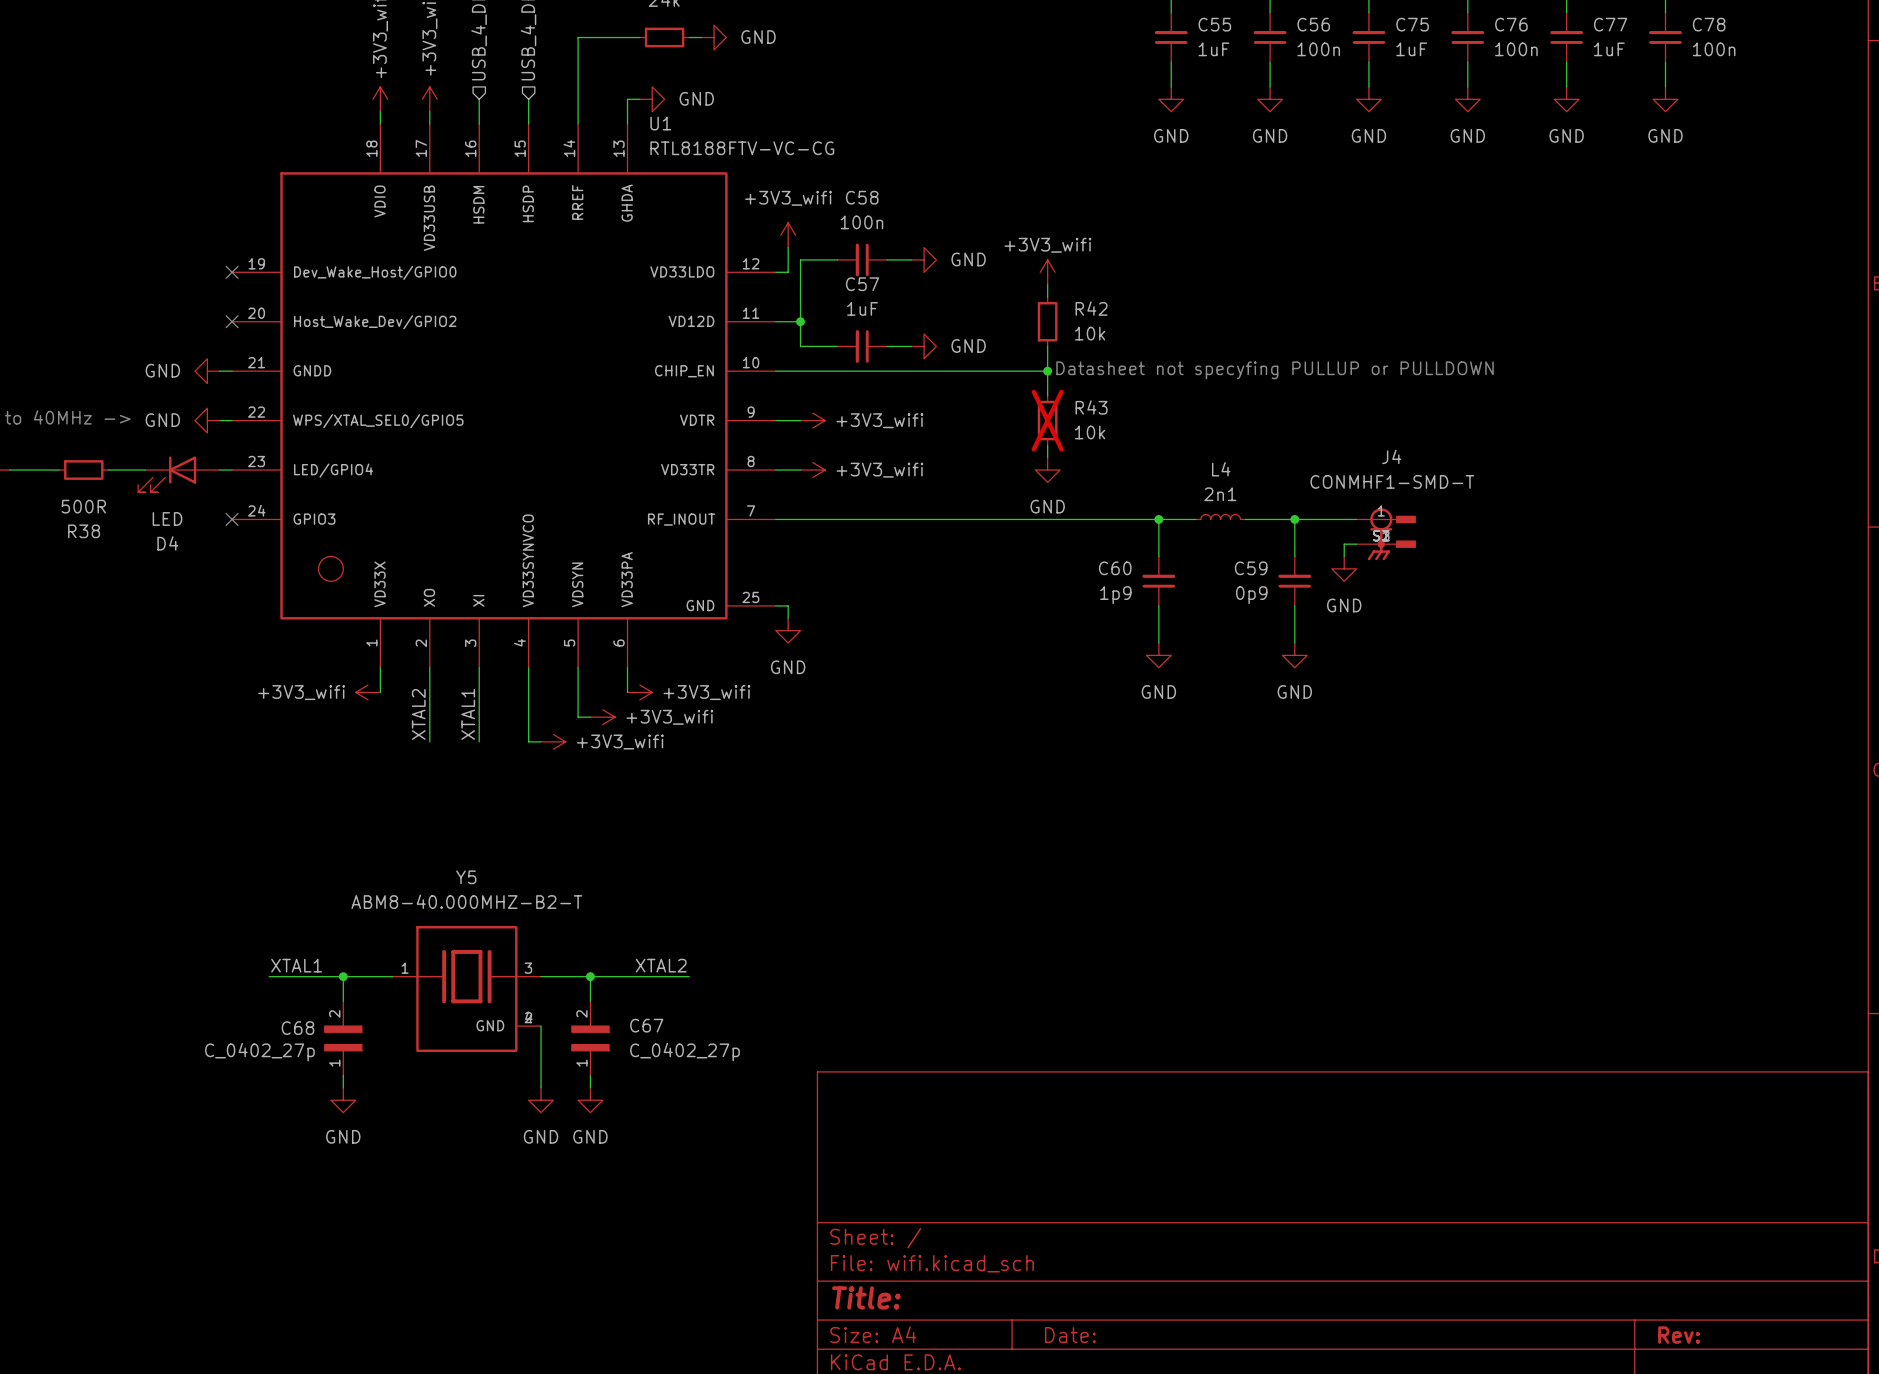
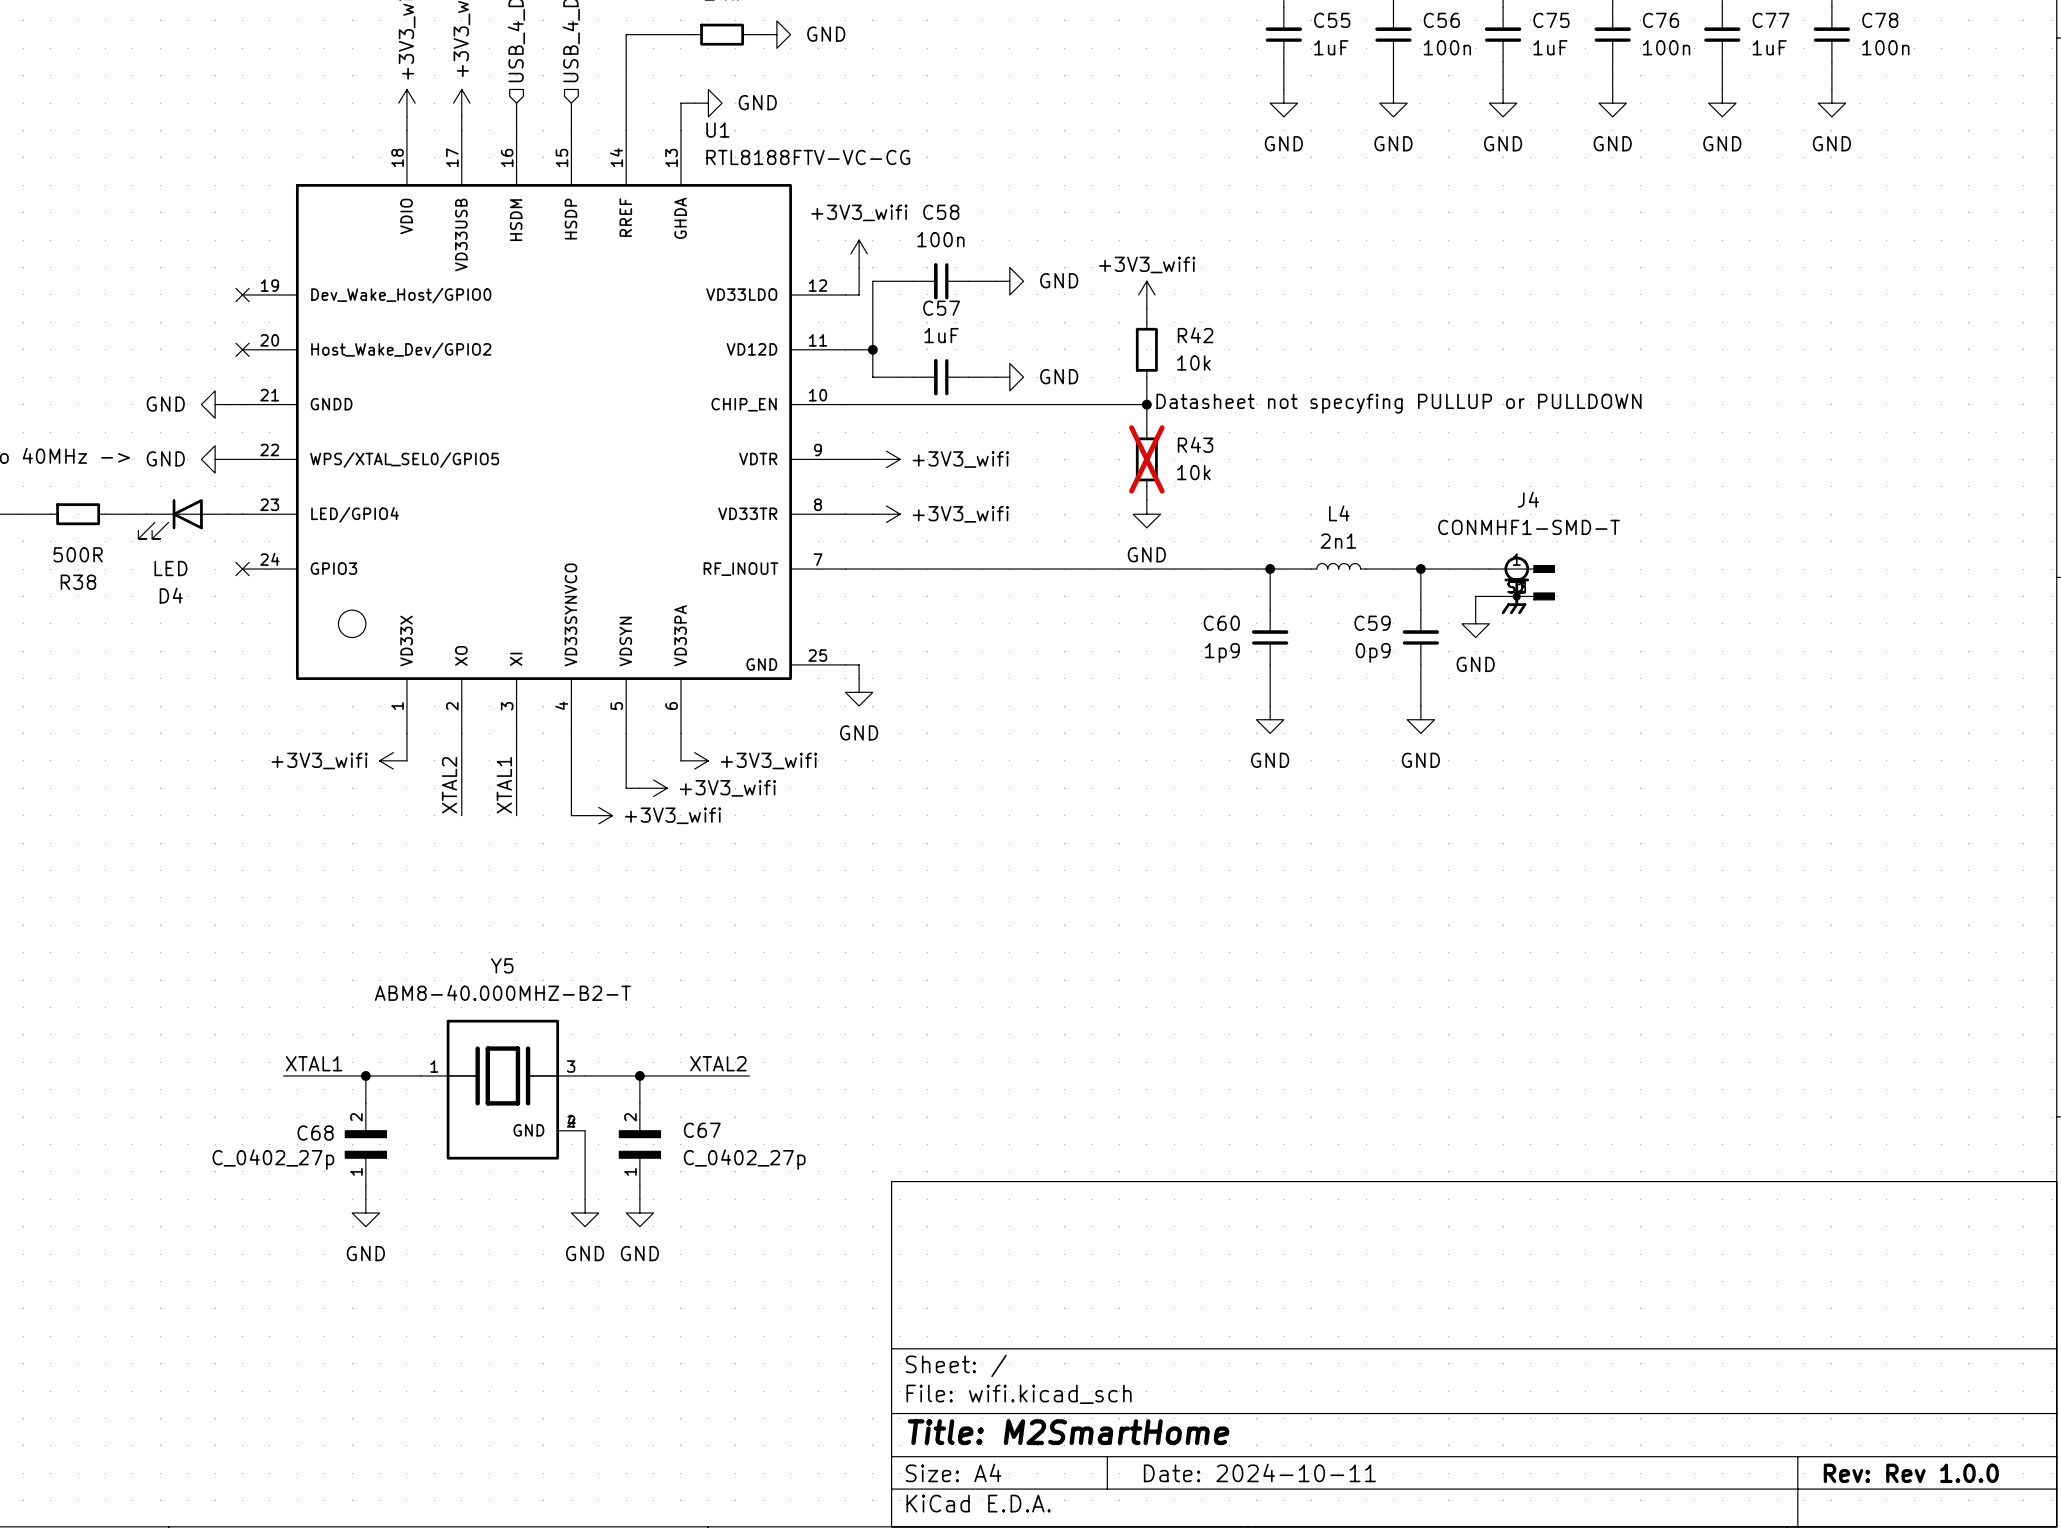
title block: Title: (866, 1297) -> Title: M2SmartHome (1068, 1432)
title block: Date: (1070, 1335) -> Date: 2024-10-11 (1259, 1472)
title block: Rev: (1679, 1335) -> Rev: Rev 1.0.0 (1911, 1473)

